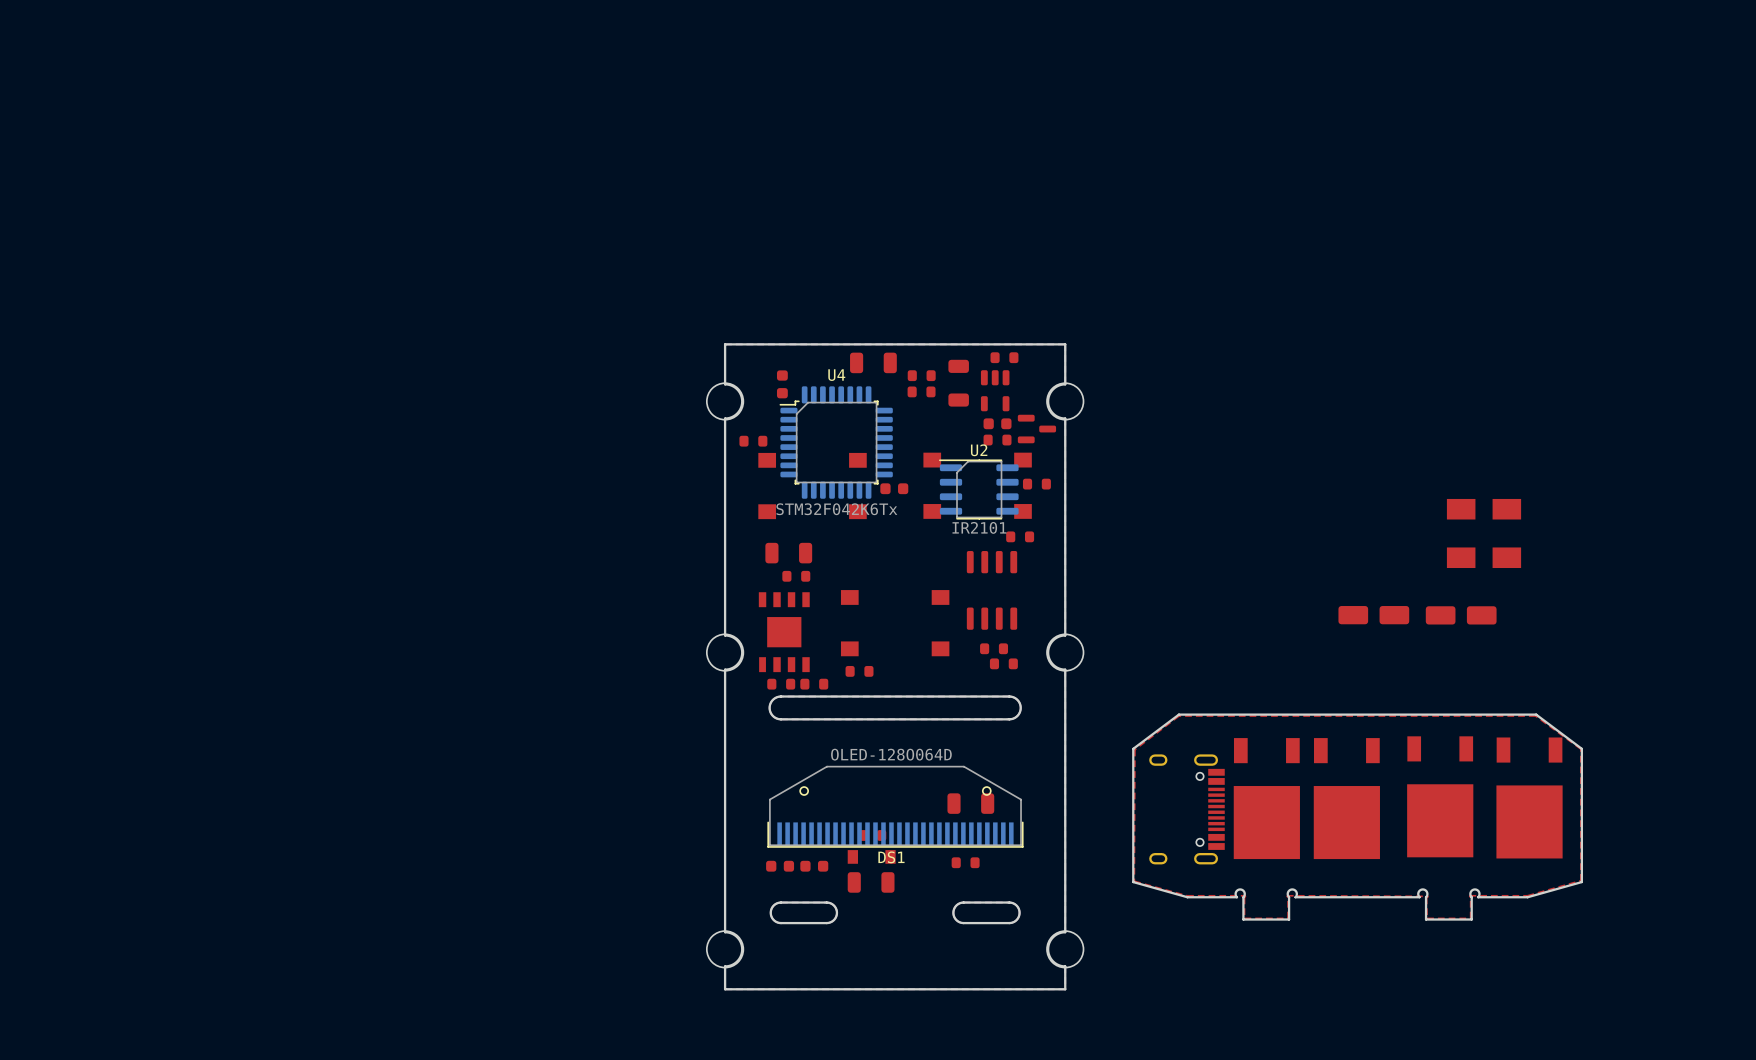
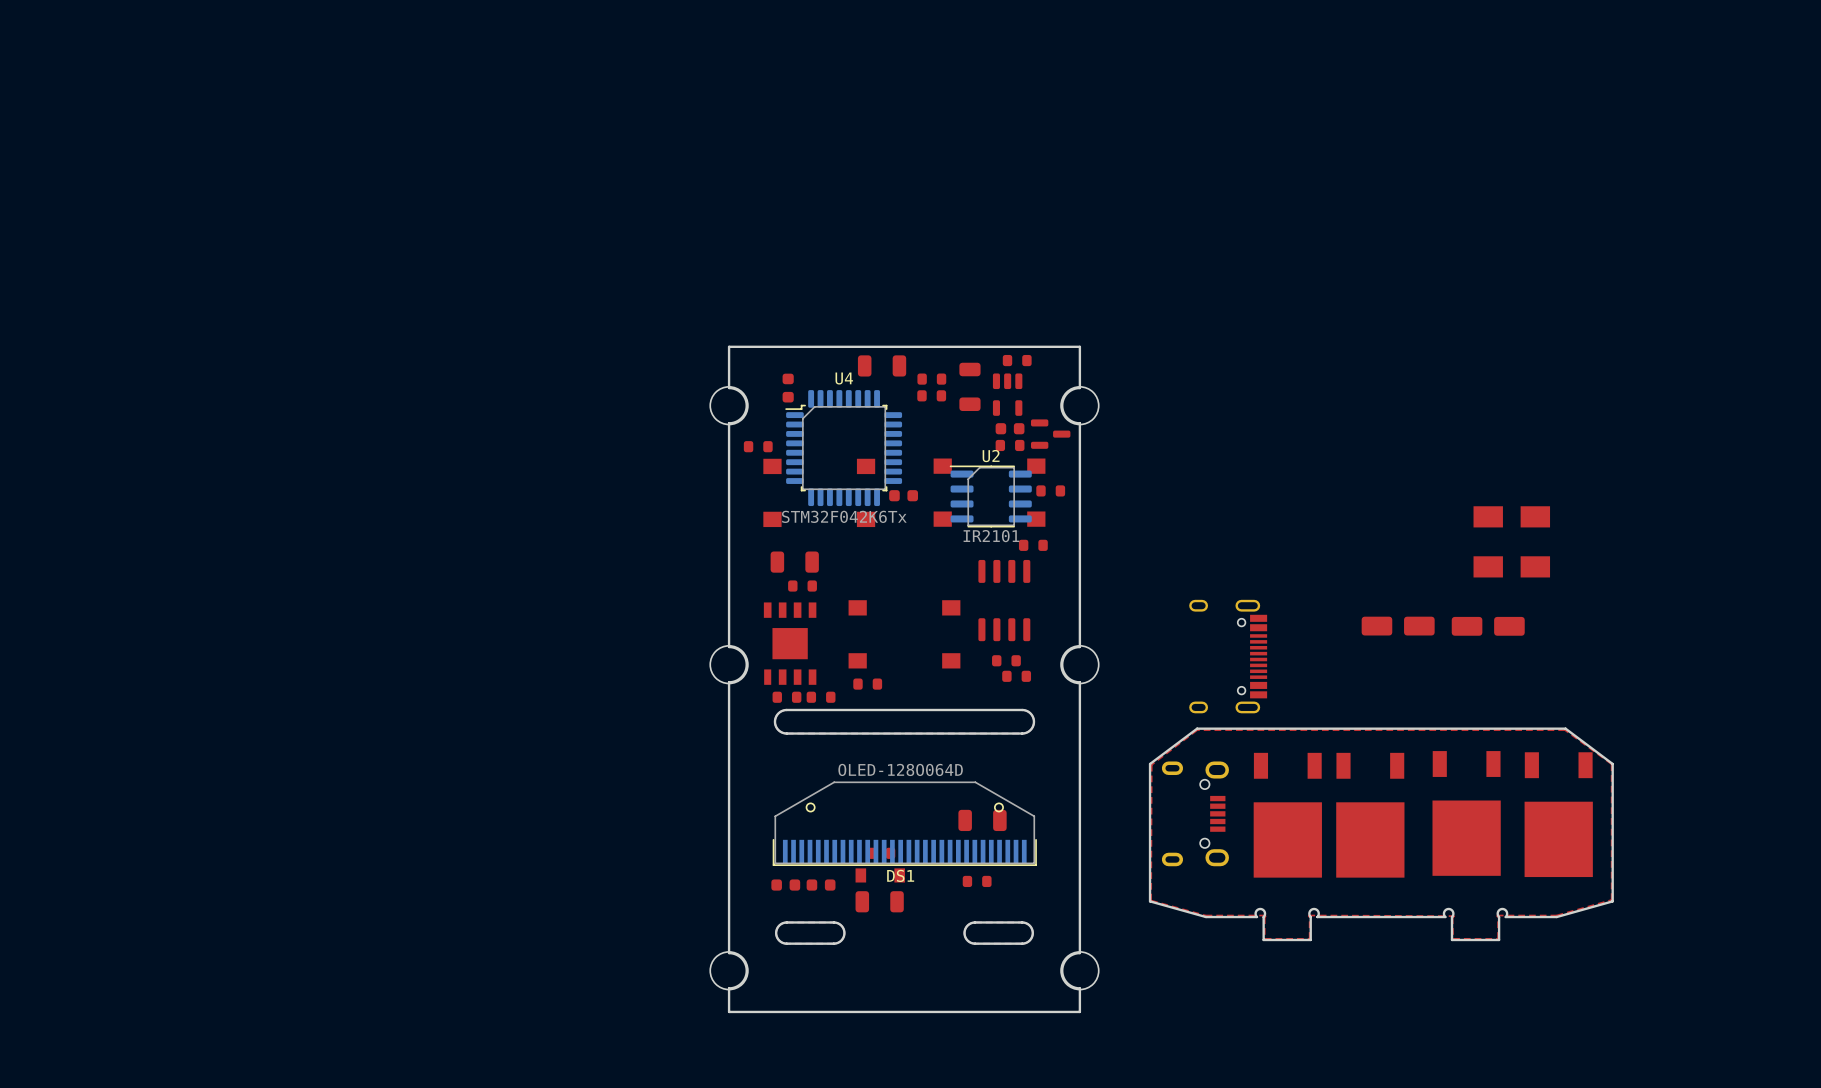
part: none -> (1195, 813)
part position: (1186, 809) -> (1228, 656)

